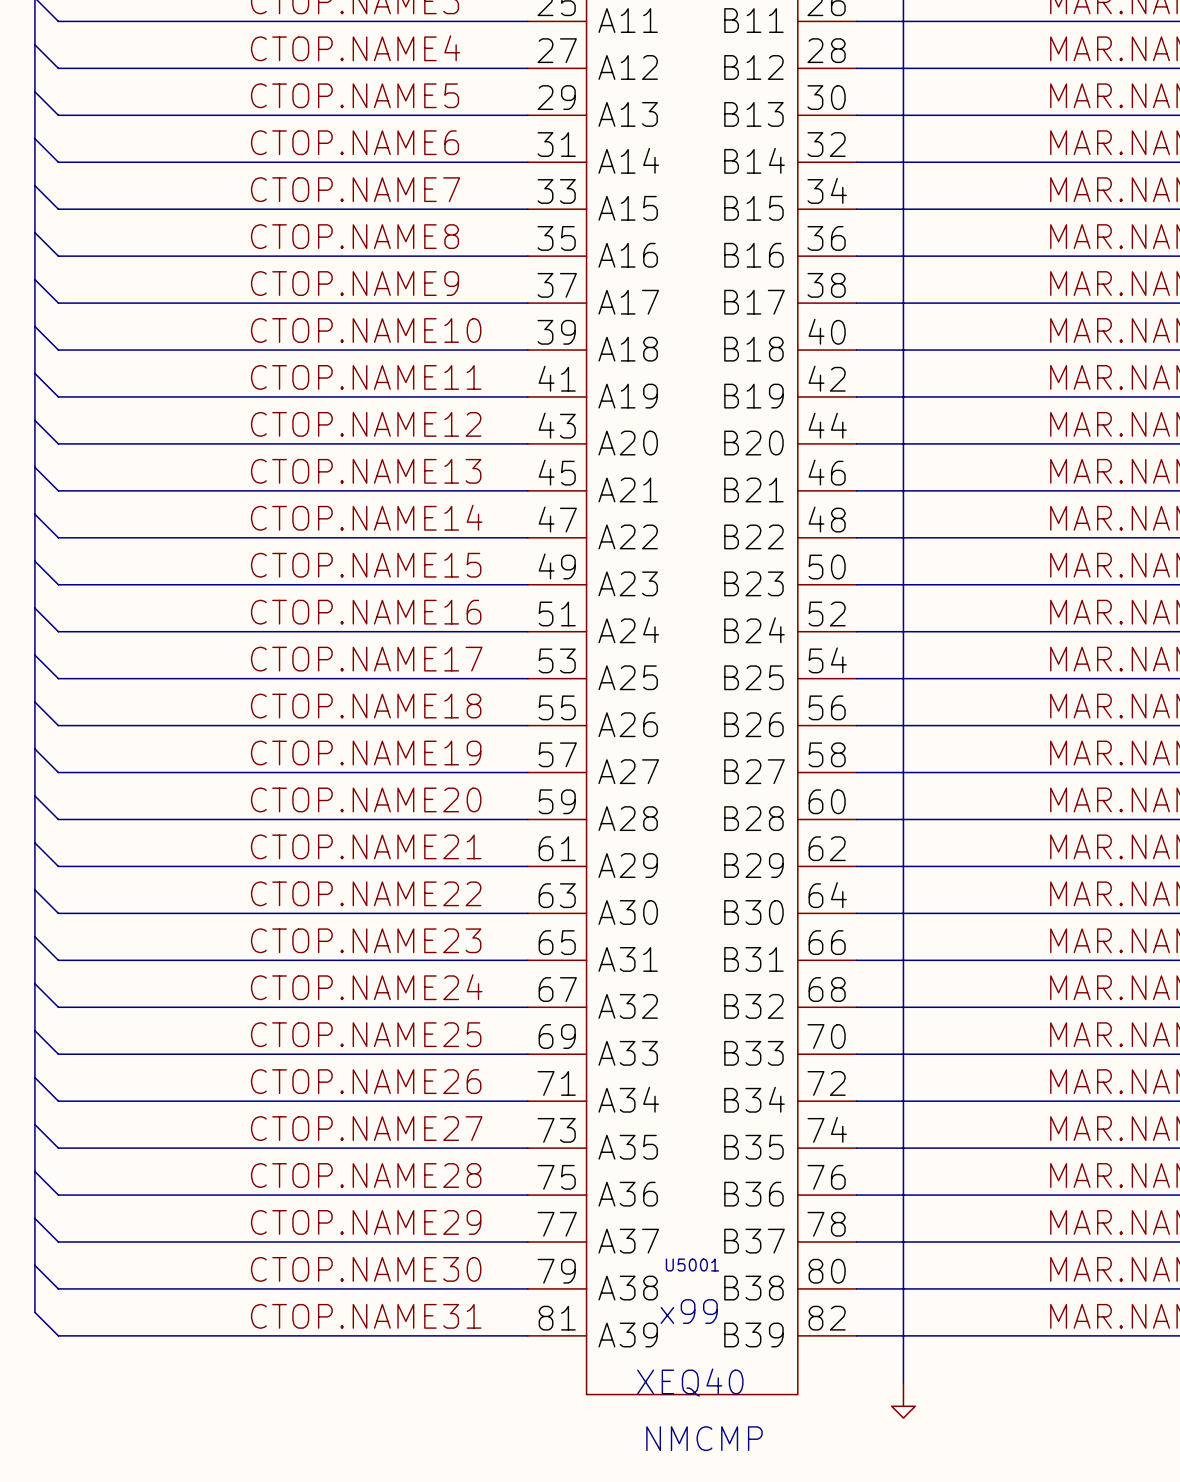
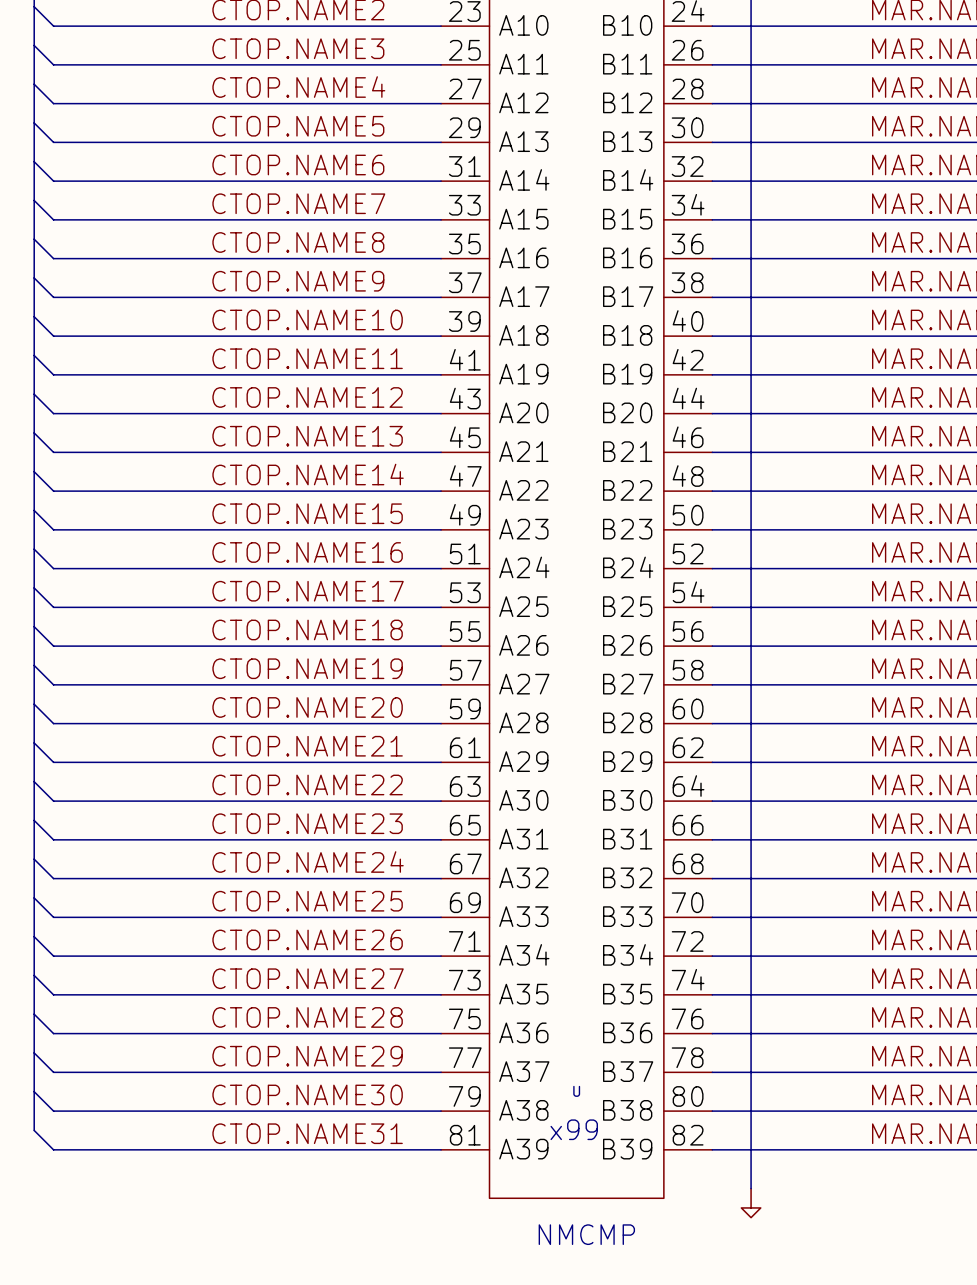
U5001 name: U5001 (692, 1265) -> U (576, 1091)
U5001 value: XEQ40 (690, 1382) -> none

